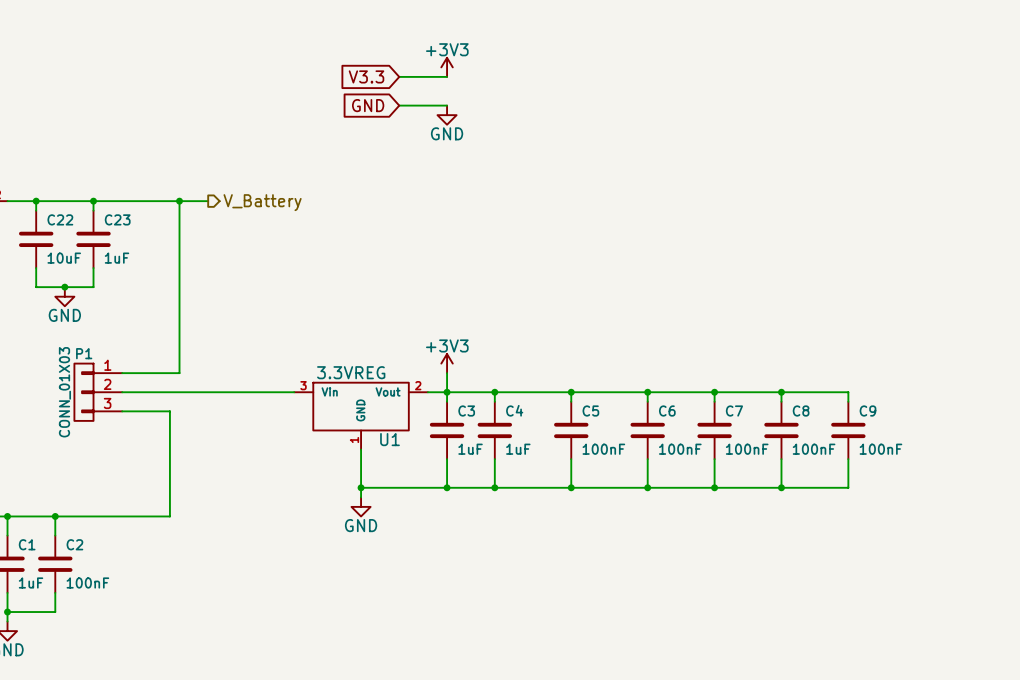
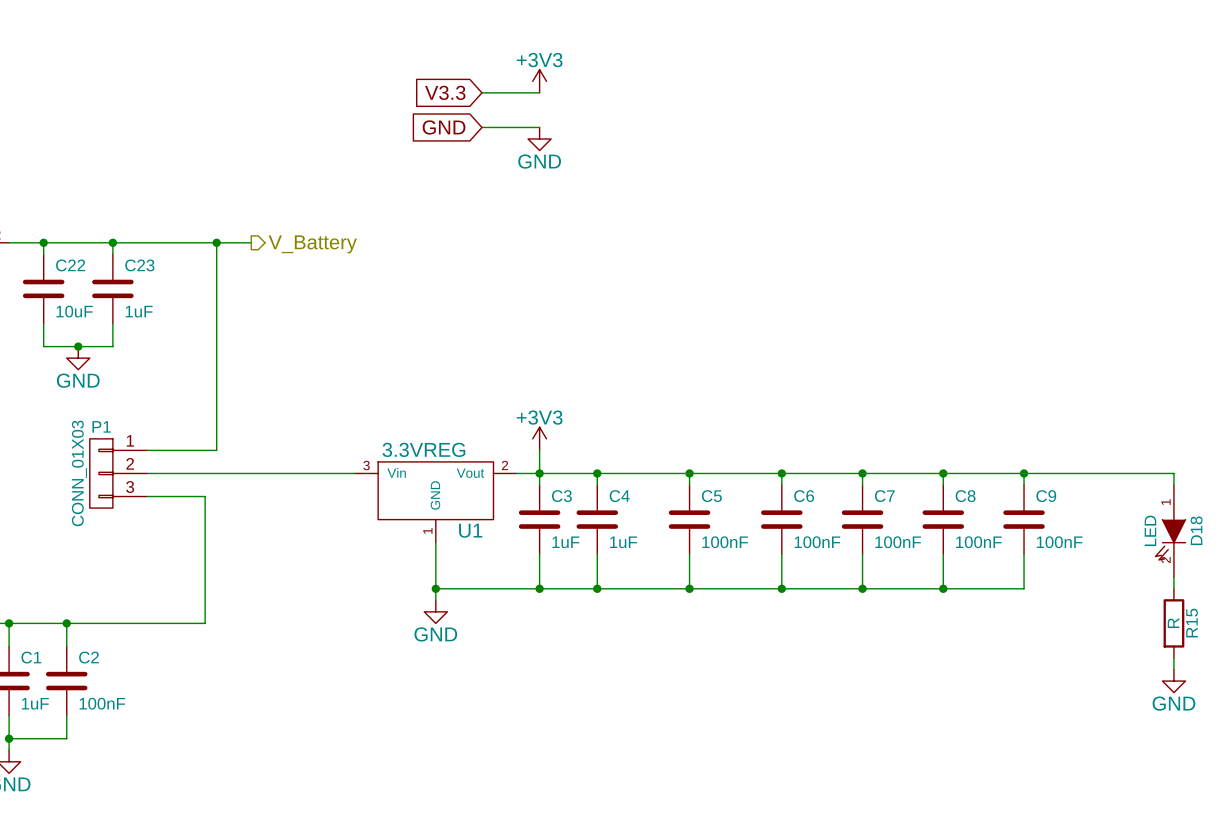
wire: none -> (1024, 473) (1173, 473) (1173, 485)
junction: none -> (1024, 473)
D18: none -> LED (1170, 531)
wire: none -> (1173, 577) (1173, 588)
R15: none -> R (1173, 623)
wire: none -> (1173, 658) (1173, 669)
power symbol: none -> GND (1173, 681)

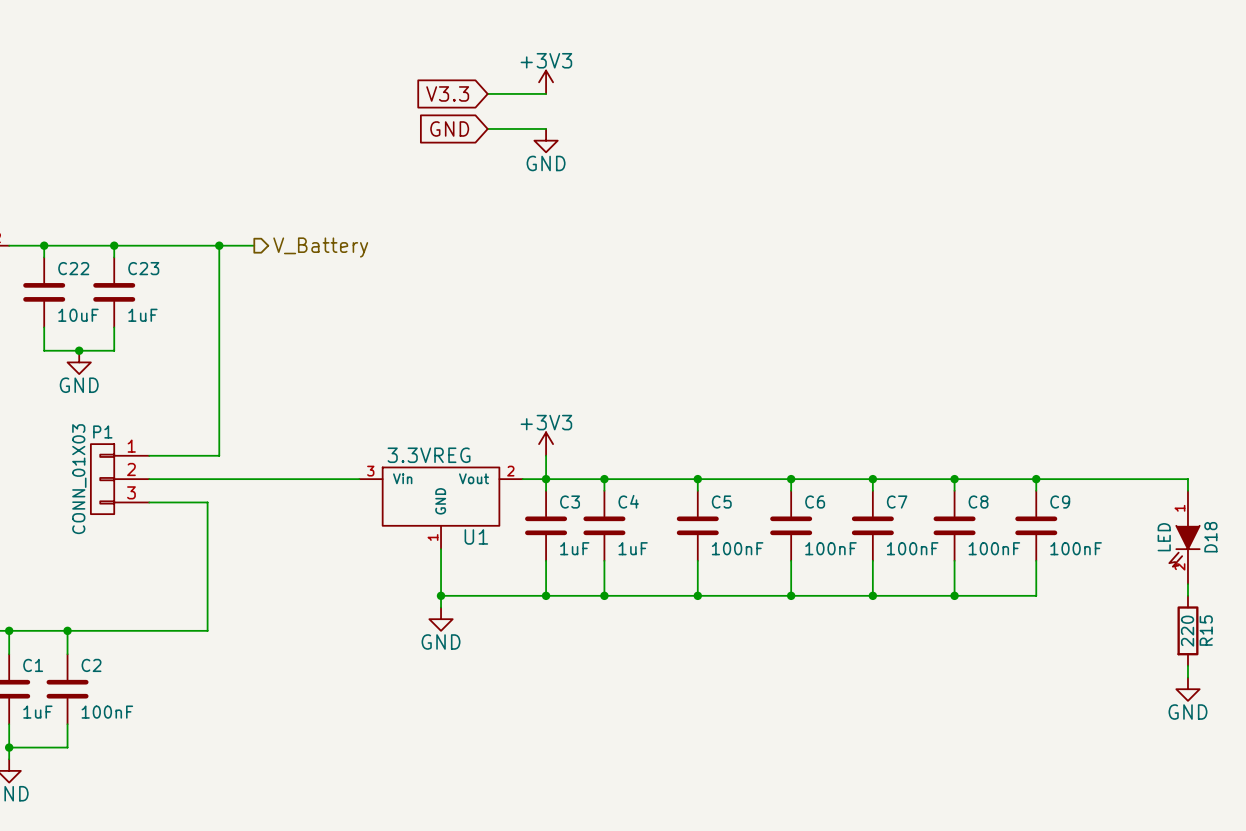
R15 value: R (1173, 623) -> 220 (1187, 631)

